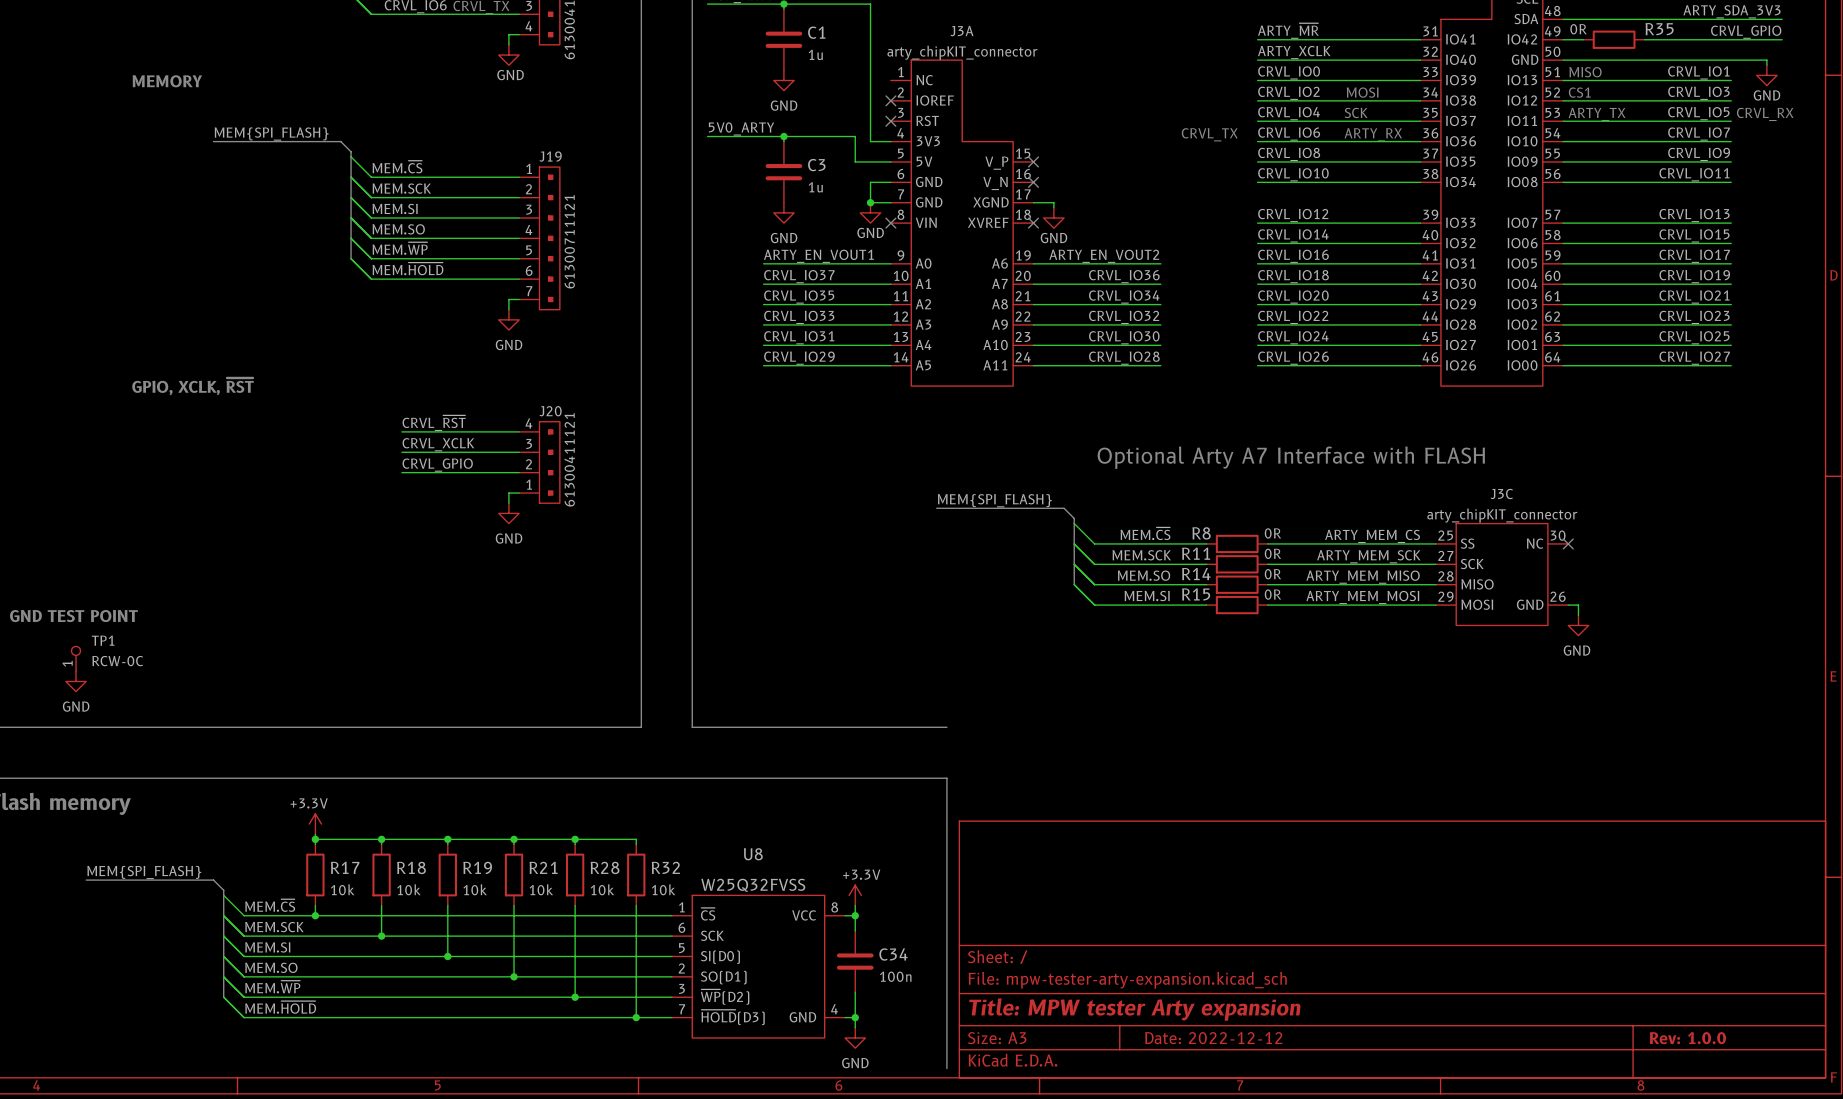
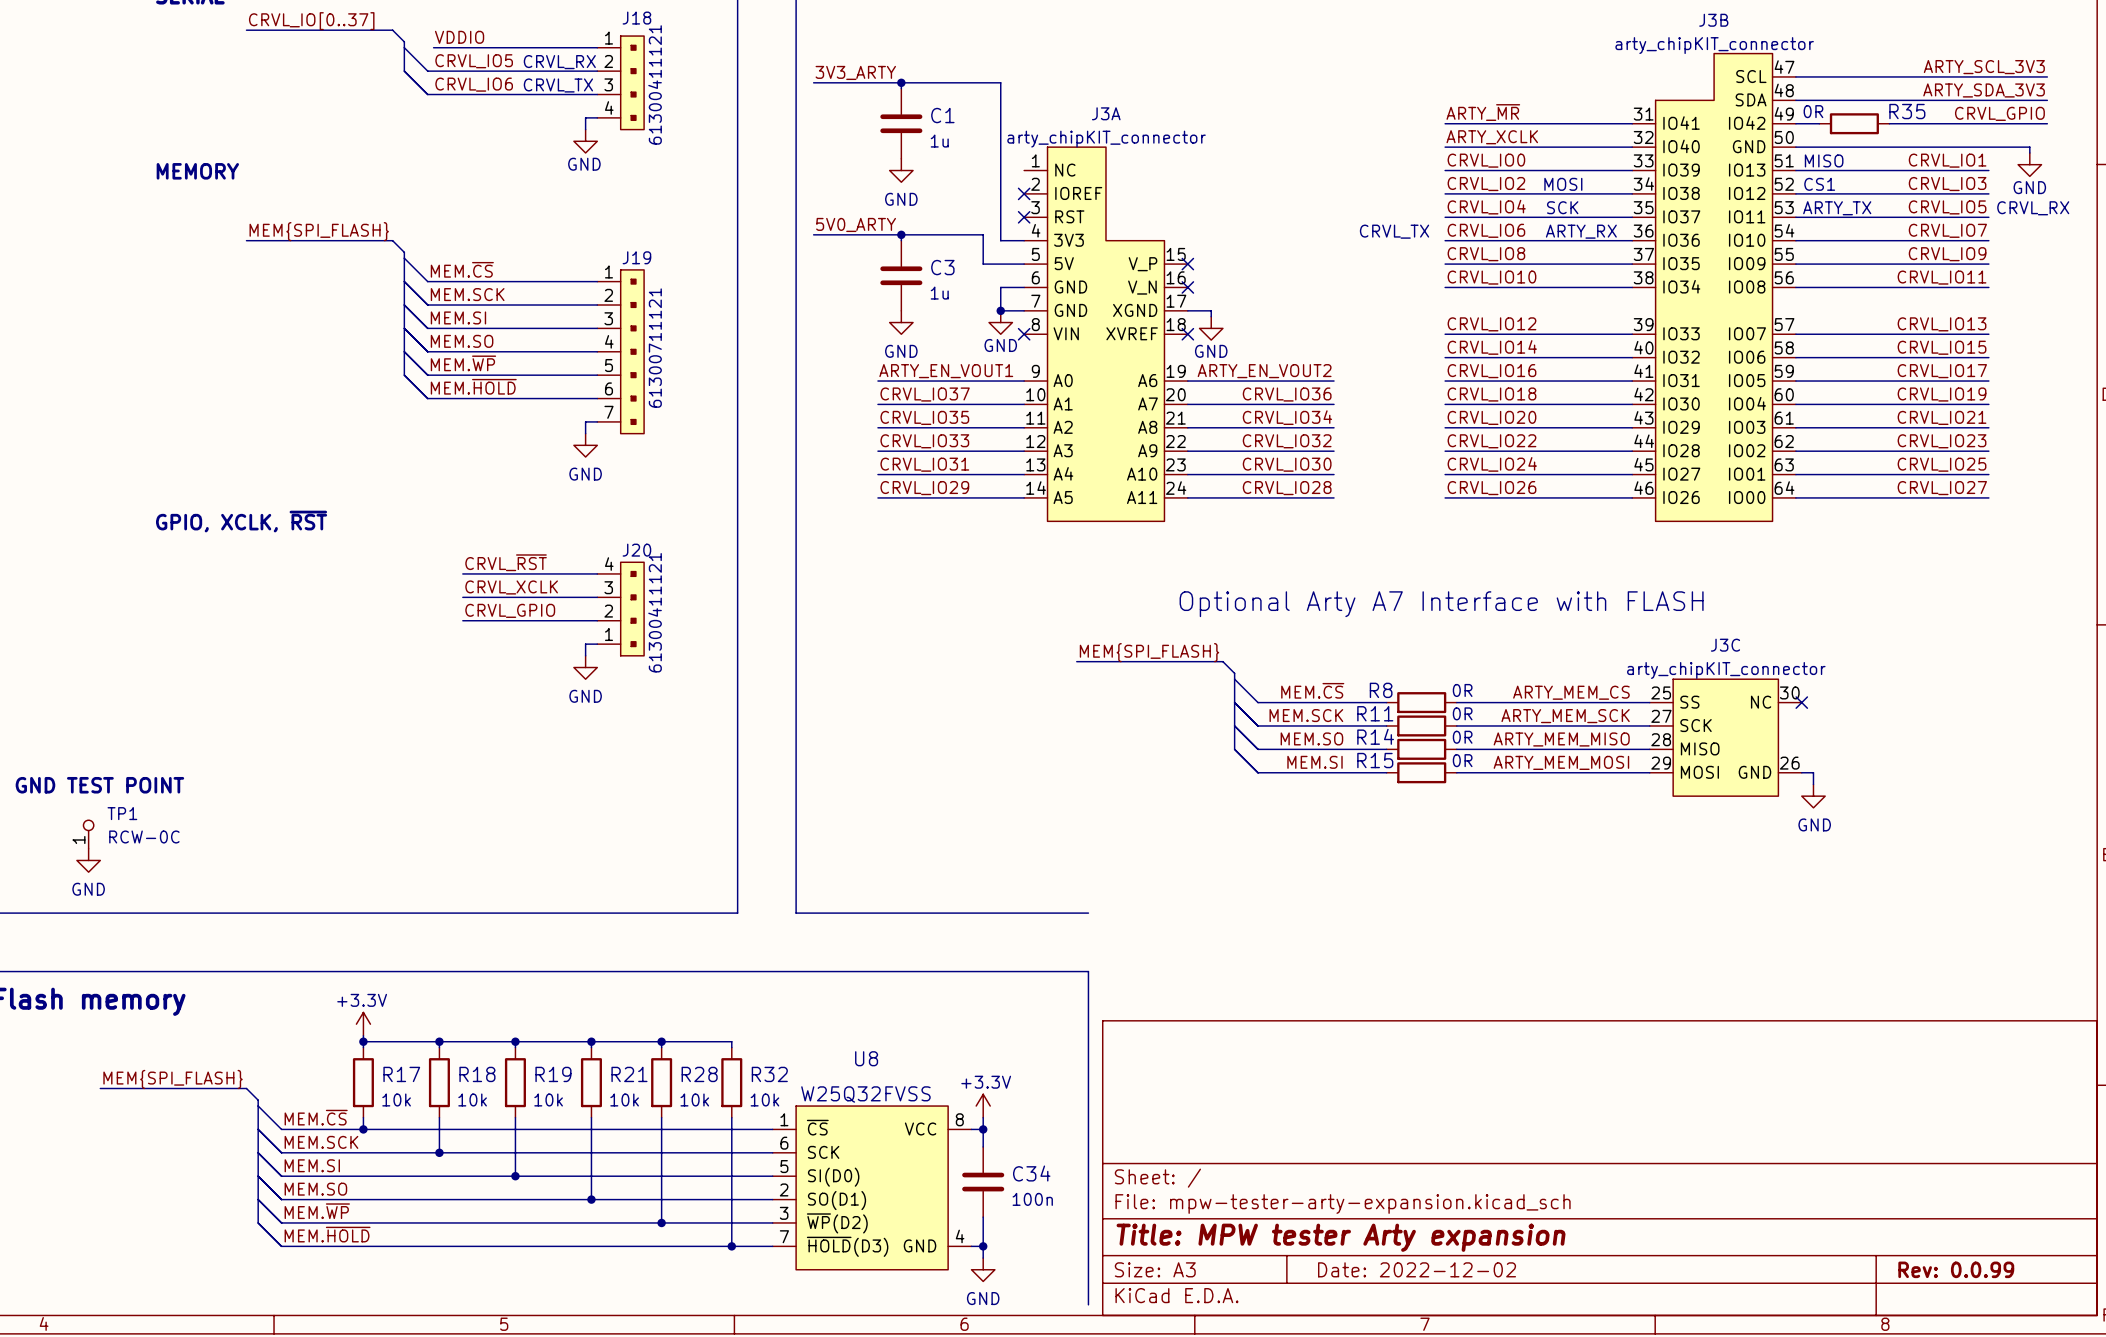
title block: Date: 2022-12-12 (1213, 1038) -> Date: 2022-12-02 (1417, 1269)
title block: Rev: 1.0.0 (1687, 1038) -> Rev: 0.0.99 (1956, 1269)

